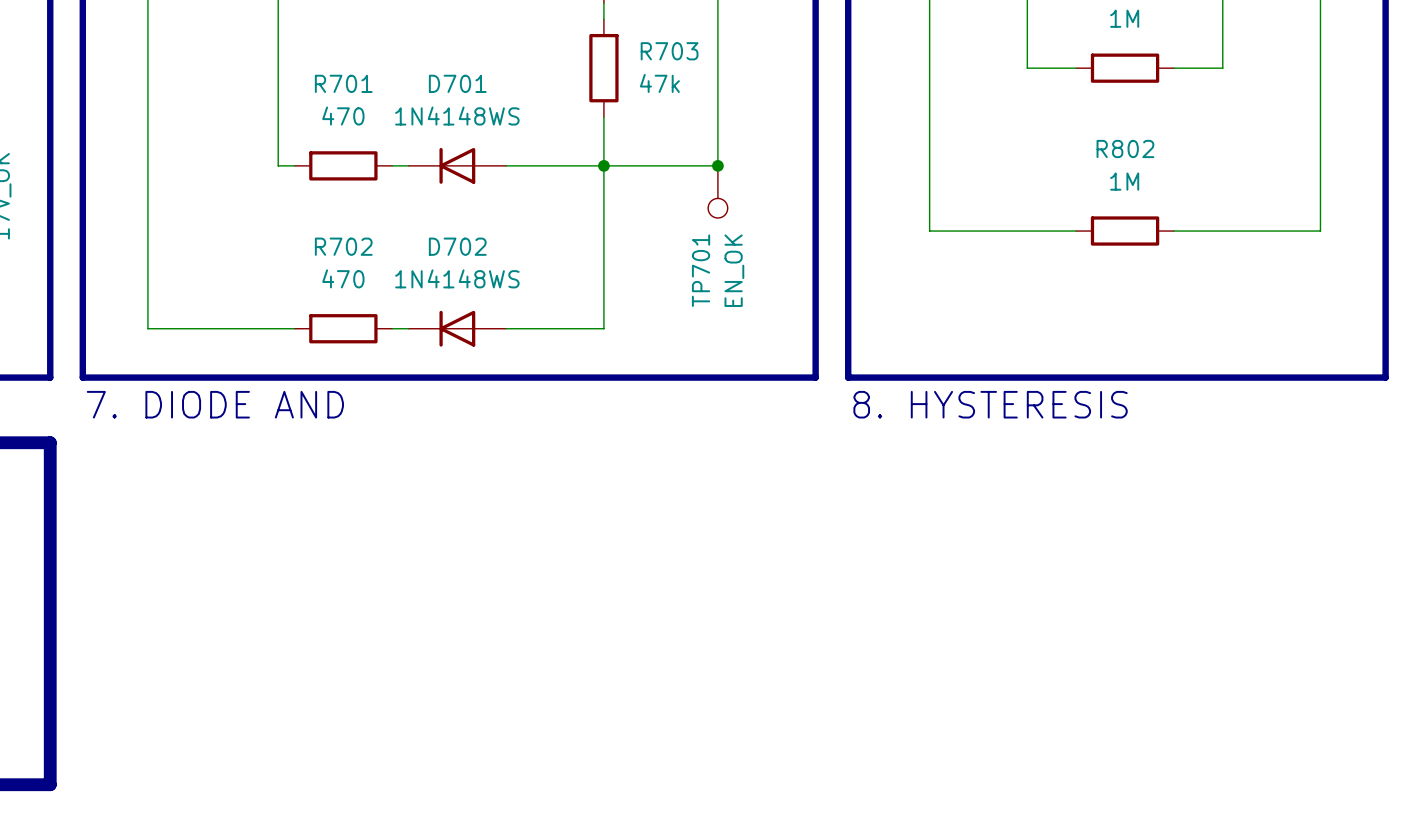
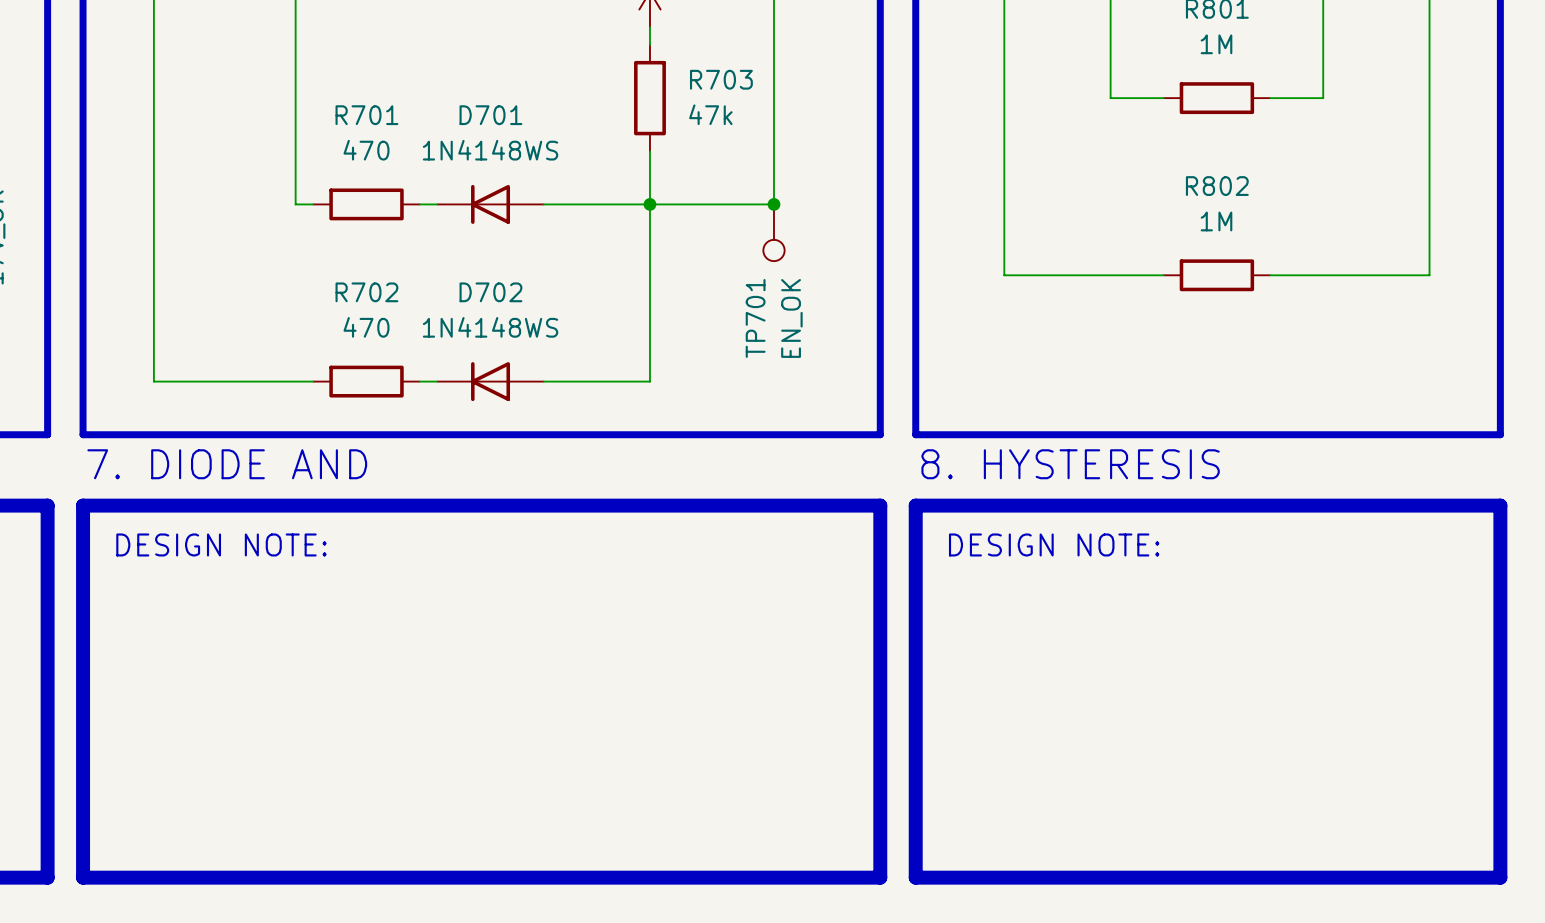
line: none -> (83, 505) (880, 505) (880, 877) (83, 877) (83, 505)
line: none -> (915, 505) (1500, 505) (1500, 877) (915, 877) (915, 505)
text: none -> DESIGN NOTE: (221, 544)
text: none -> DESIGN NOTE: (1054, 544)

